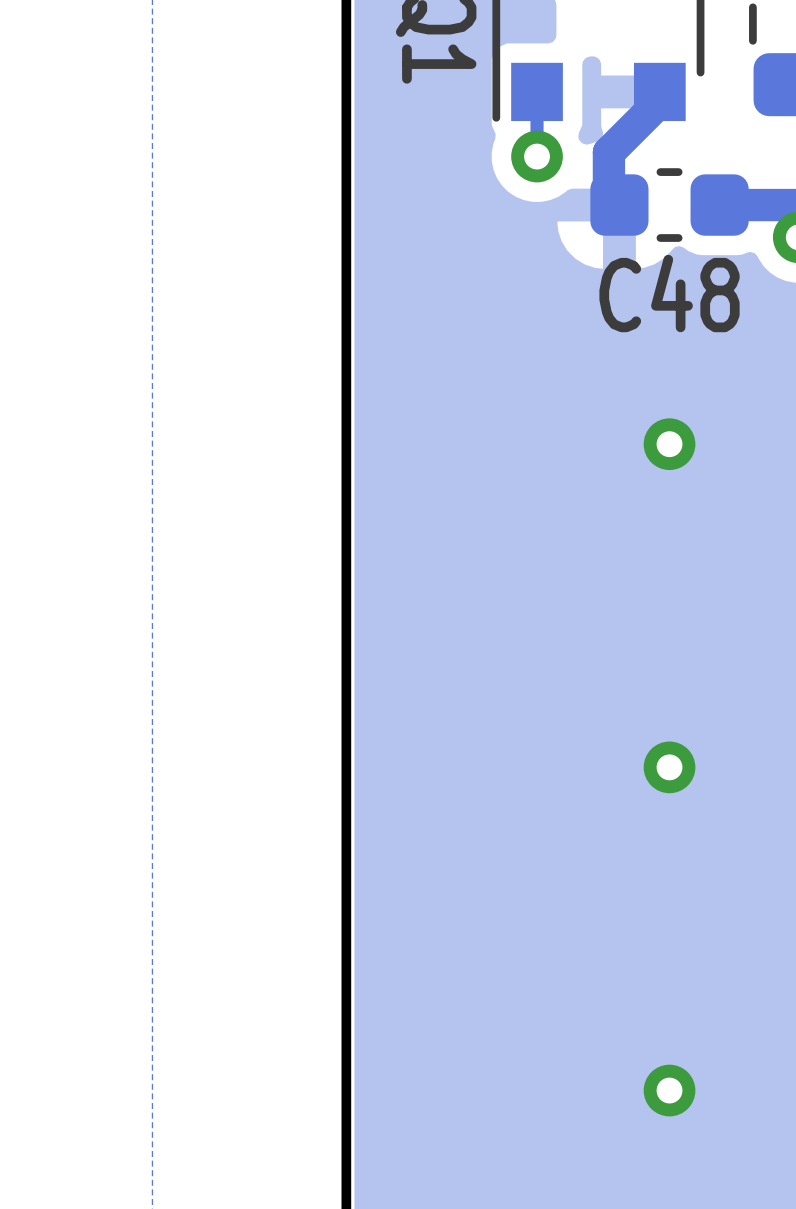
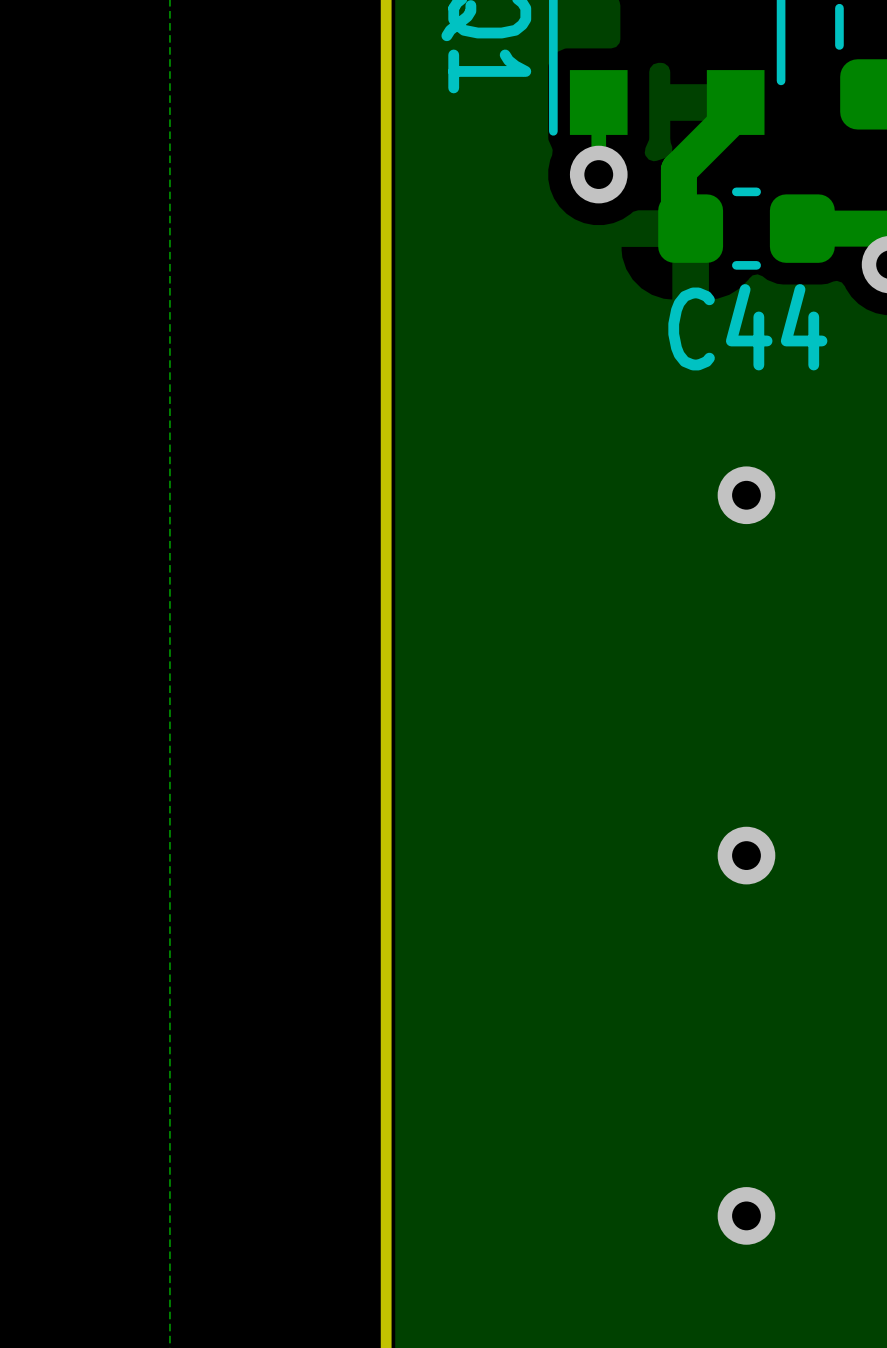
C48 name: C48 (669, 293) -> C44 (747, 327)

